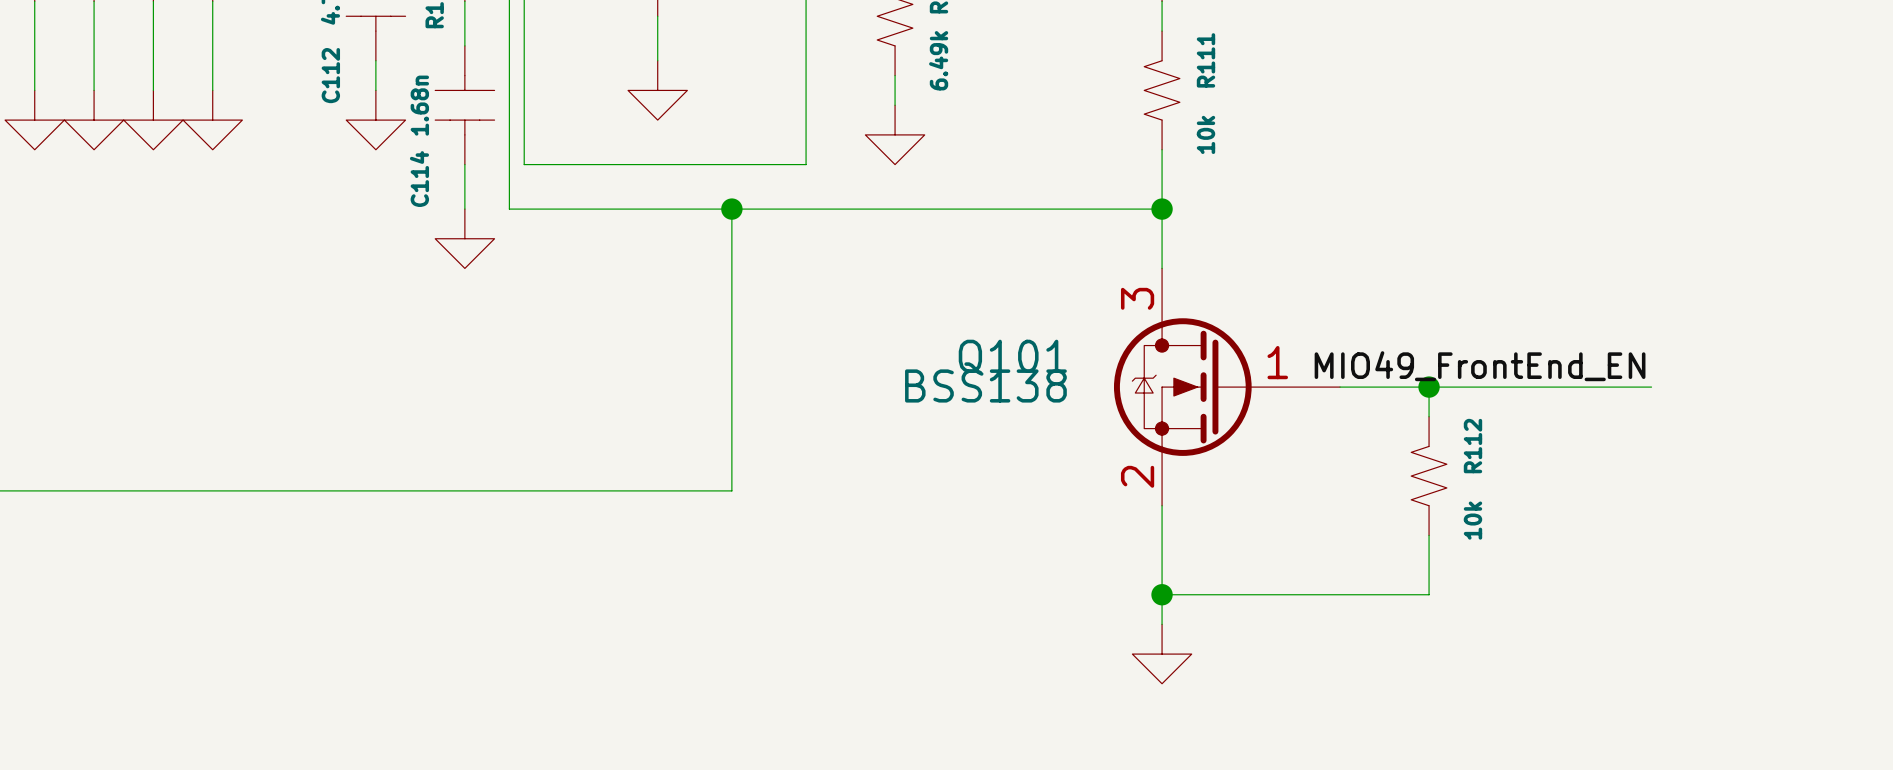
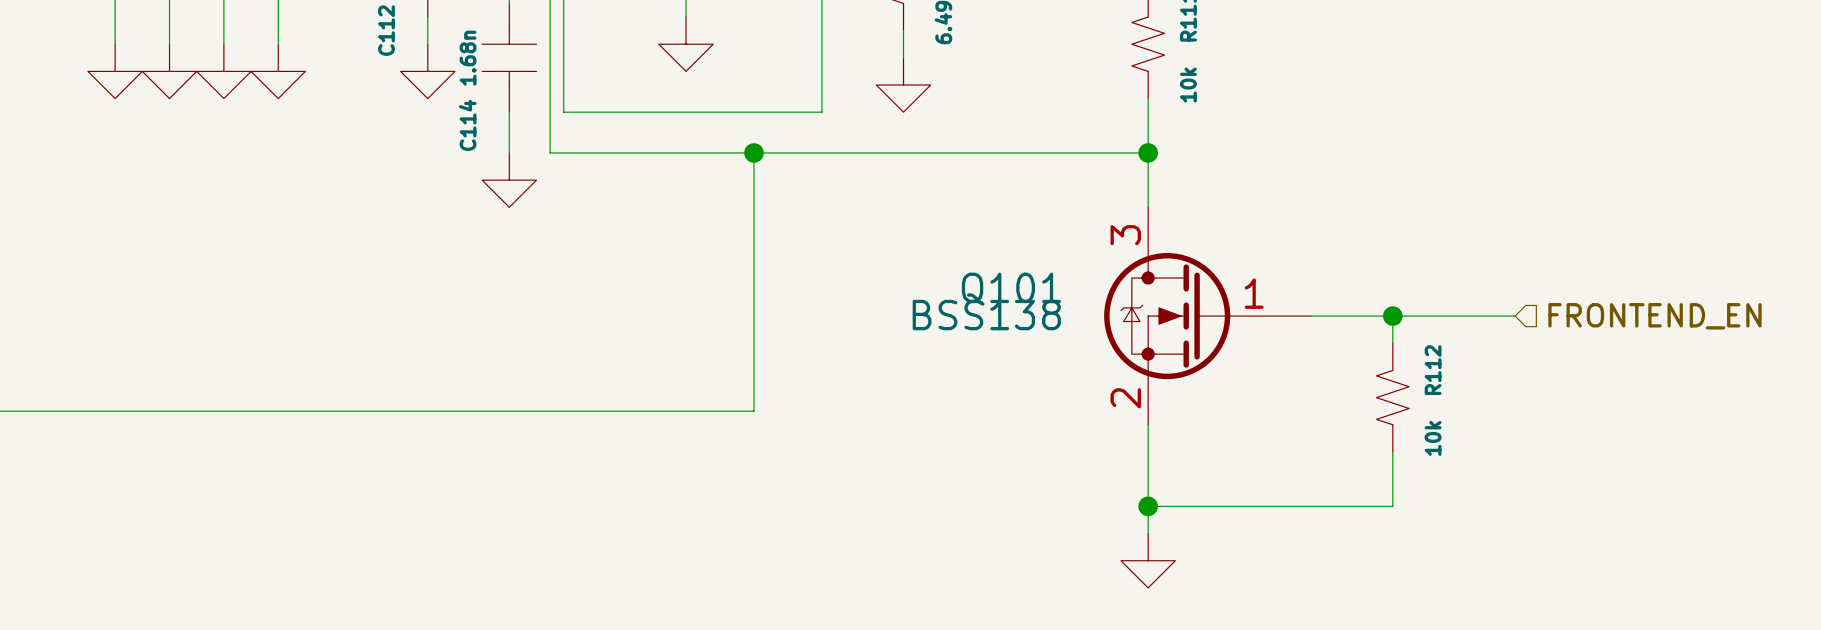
label: MIO49_FrontEnd_EN (1480, 366) -> none
wire: (1562, 387) (1651, 387) -> none
hierarchical label: none -> FRONTEND_EN (1654, 316)

